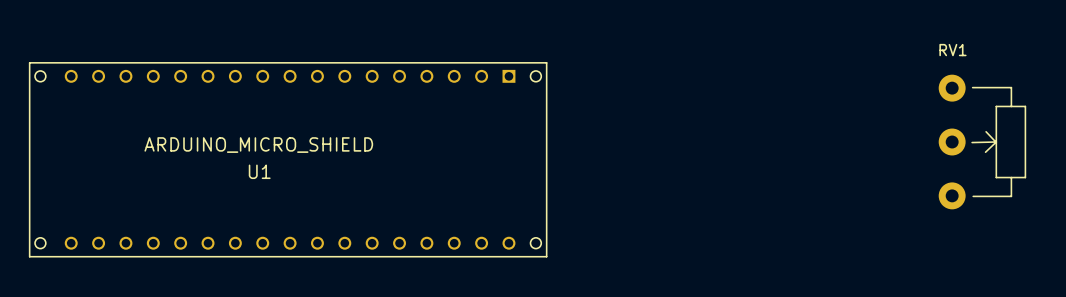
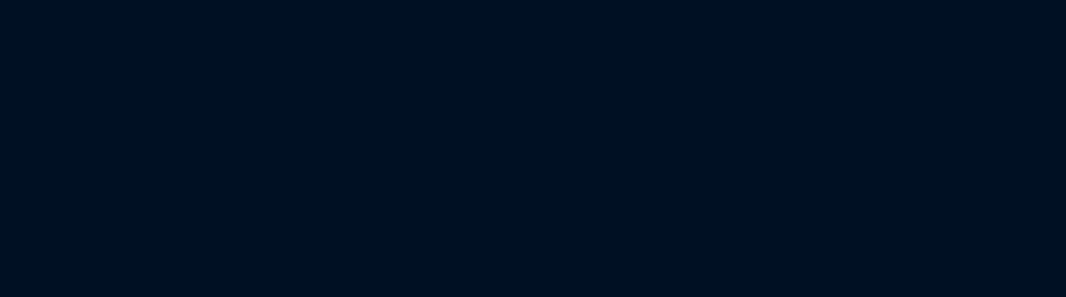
RV1: (982, 142) -> none
U1: ARDUINO_MICRO_SHIELD (288, 159) -> none

